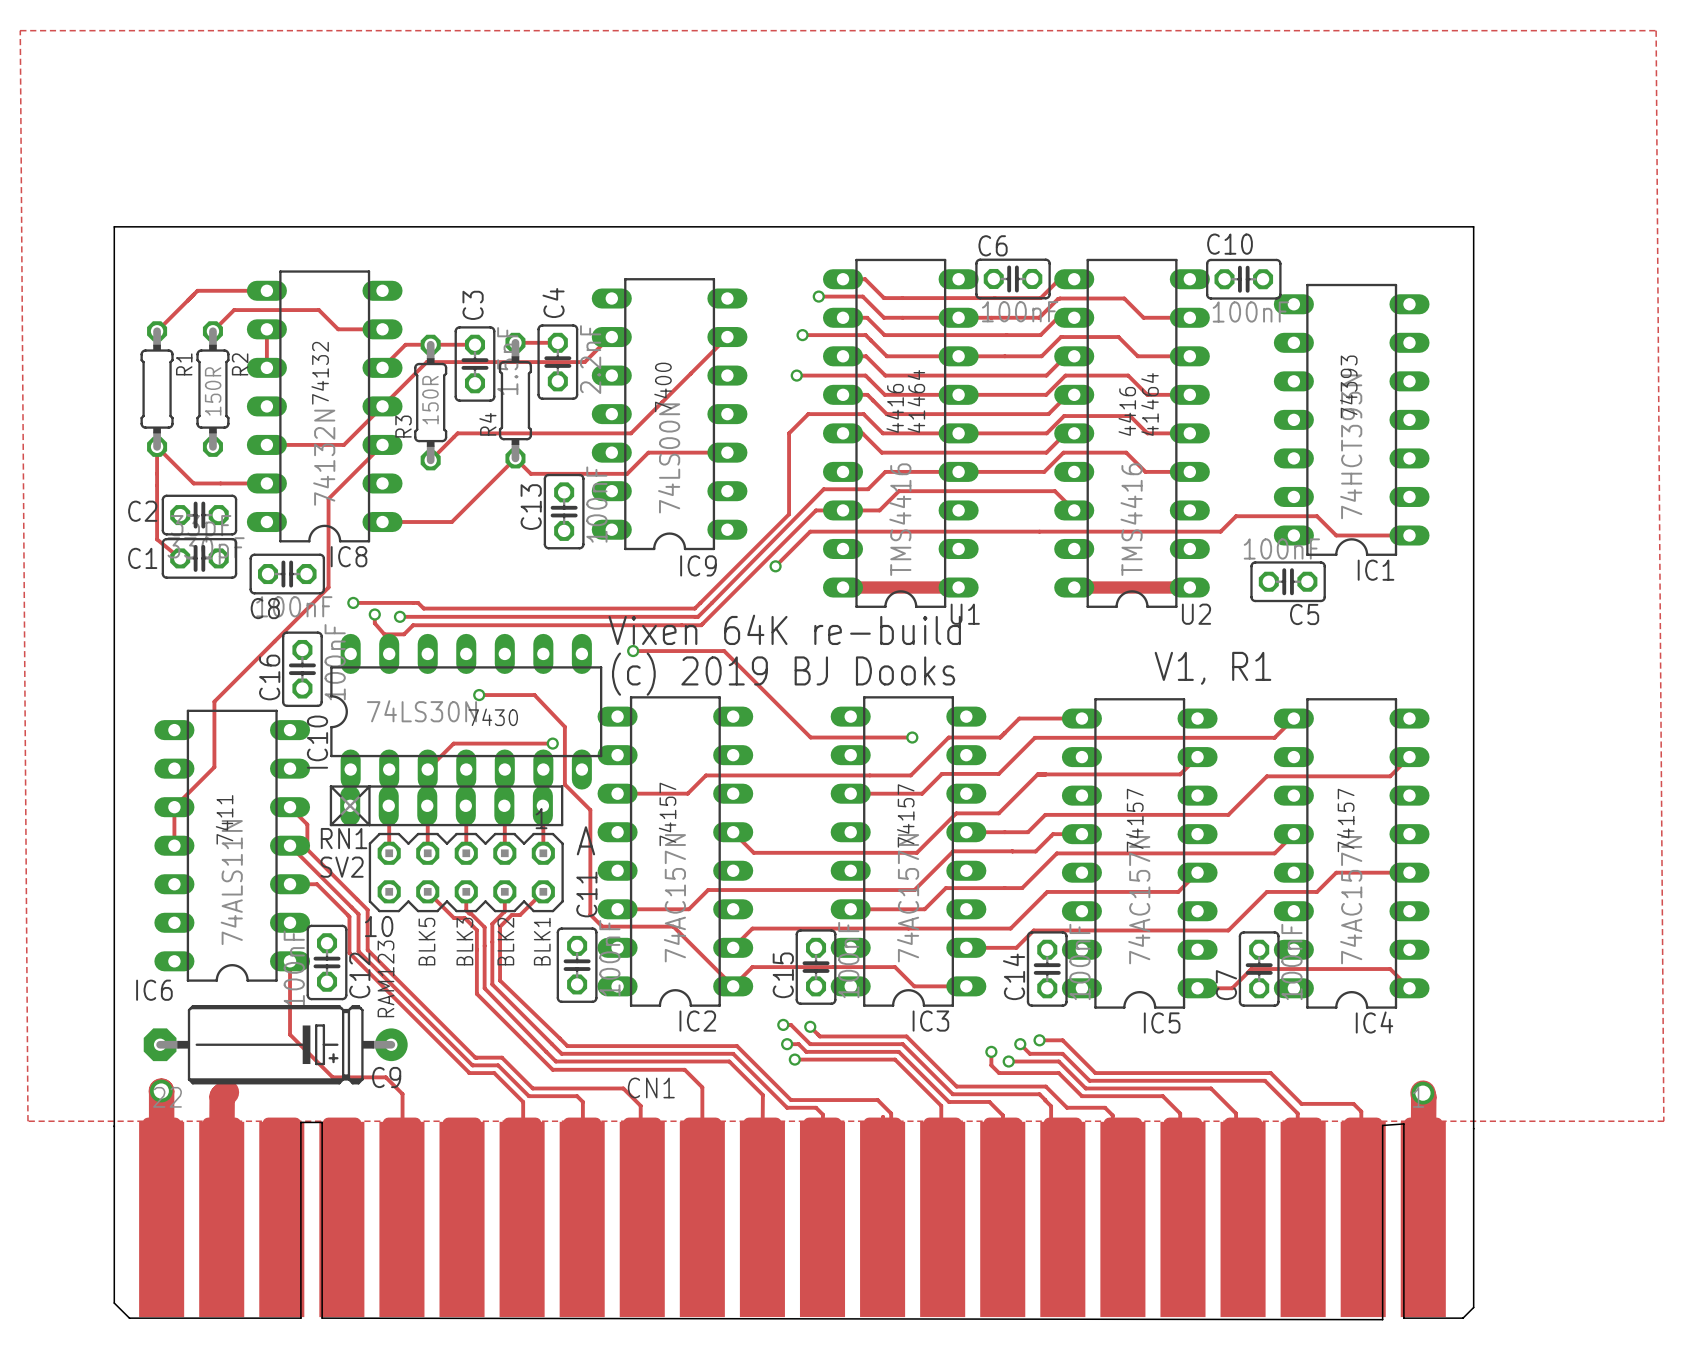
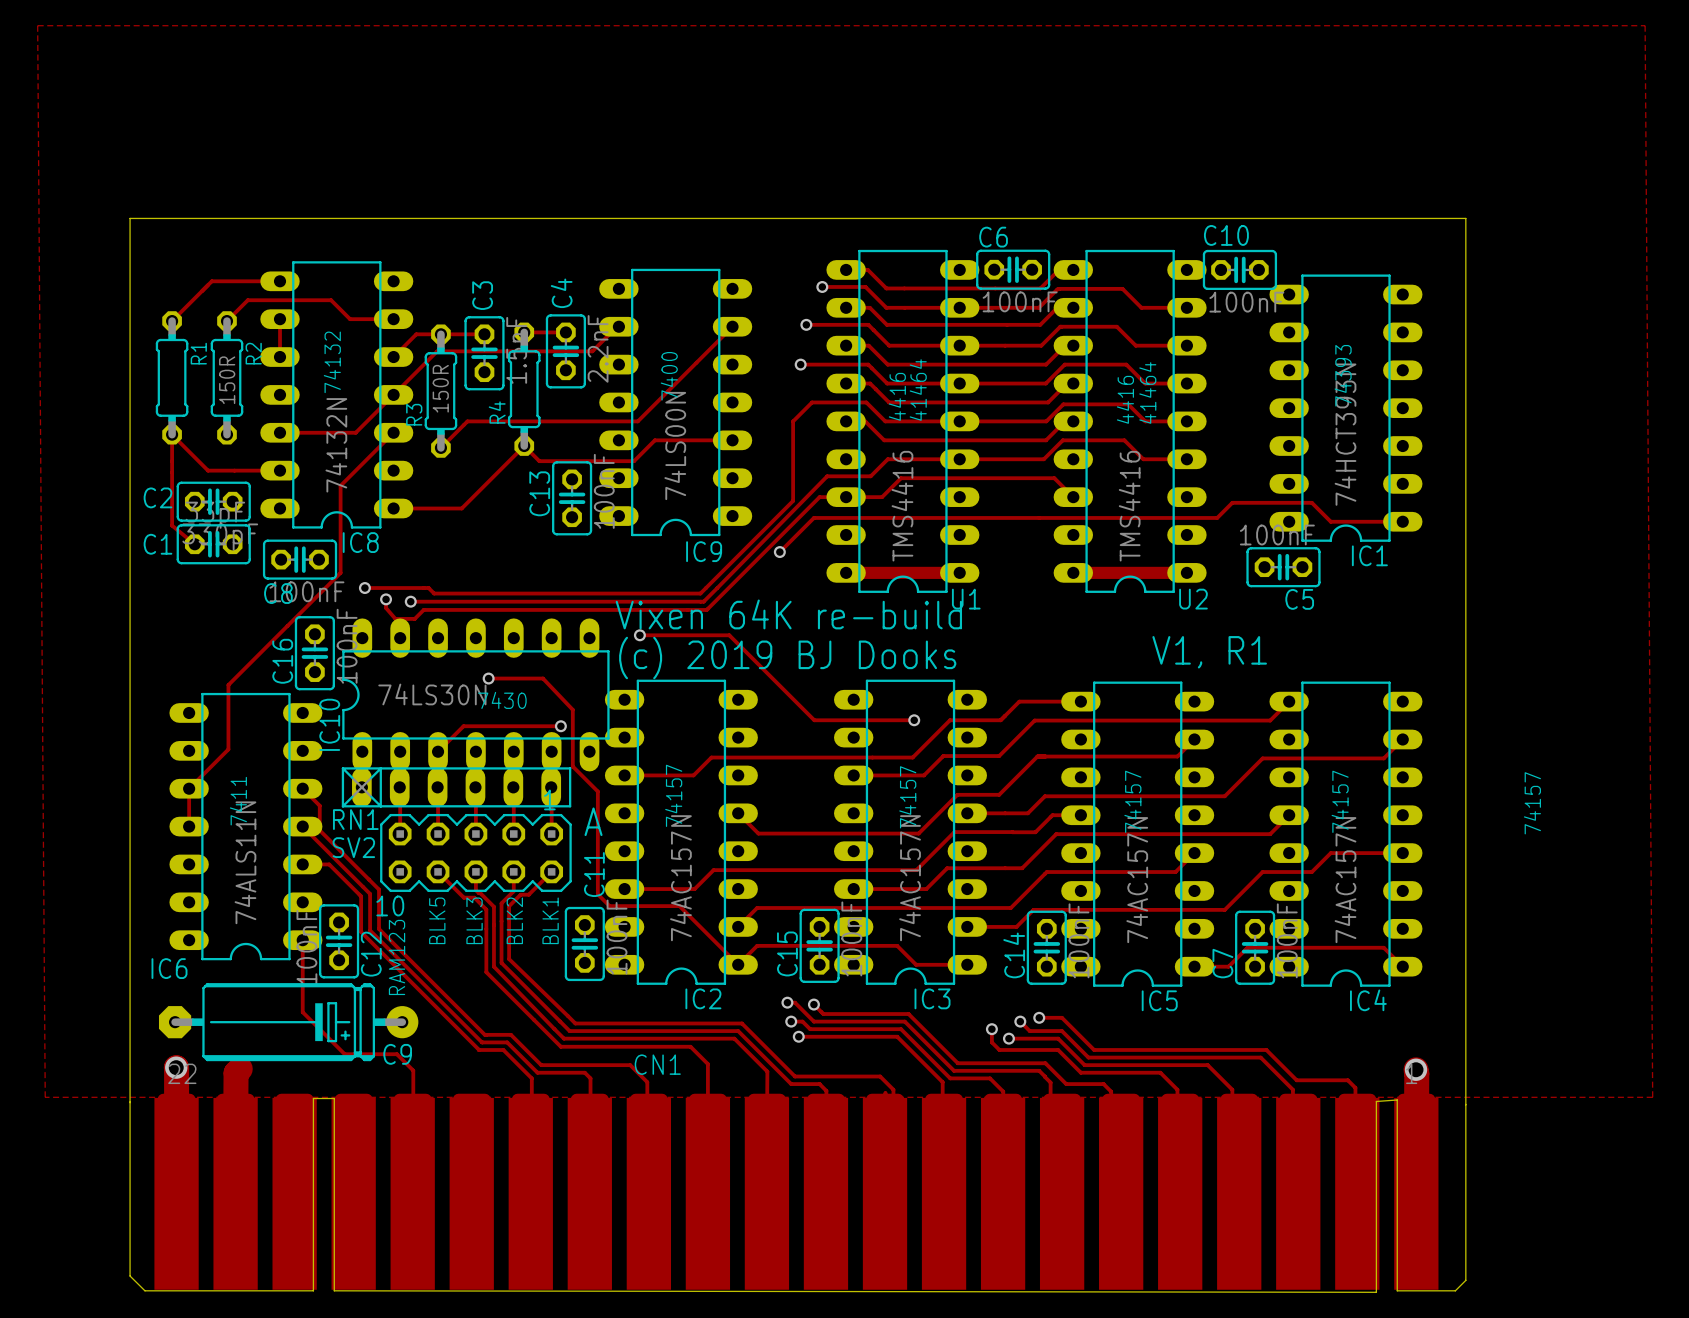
text: none -> 74157 (1532, 803)

